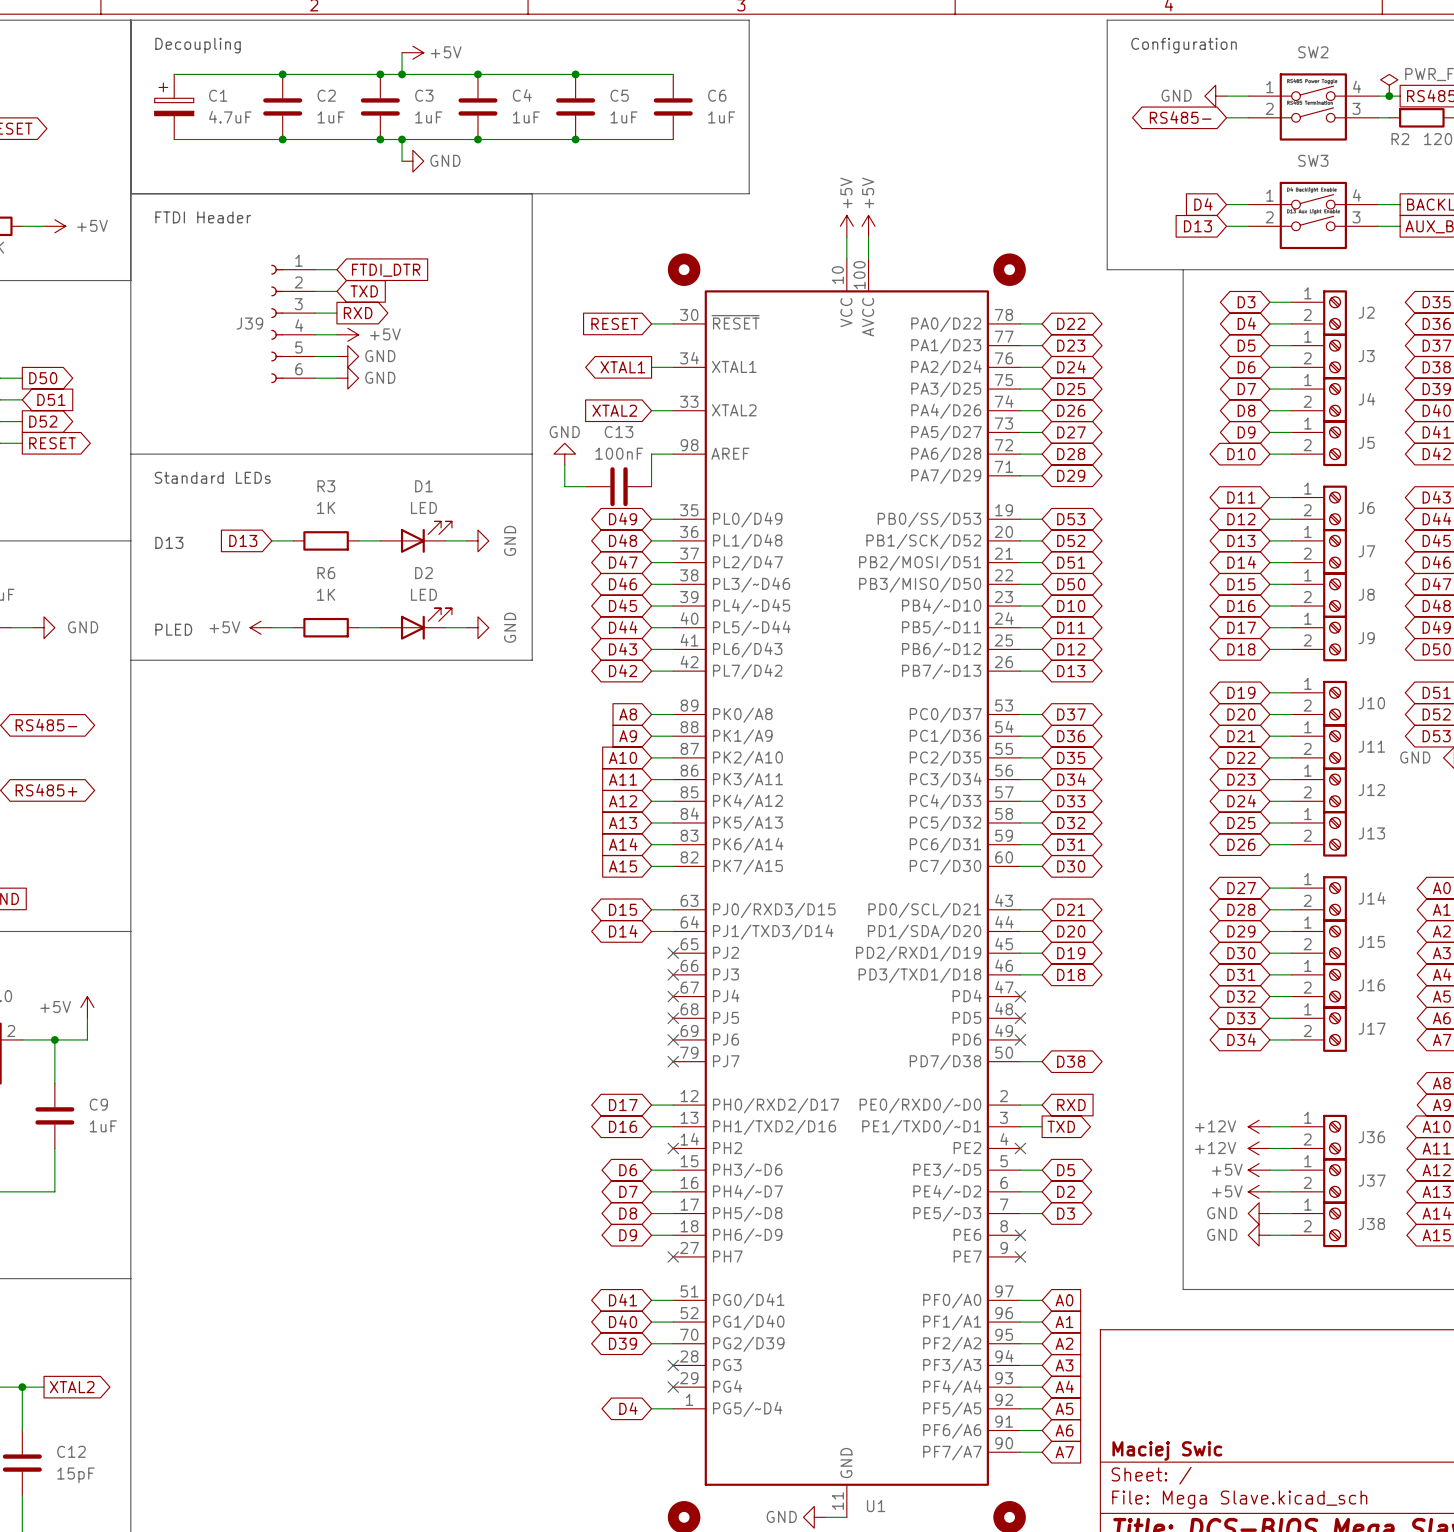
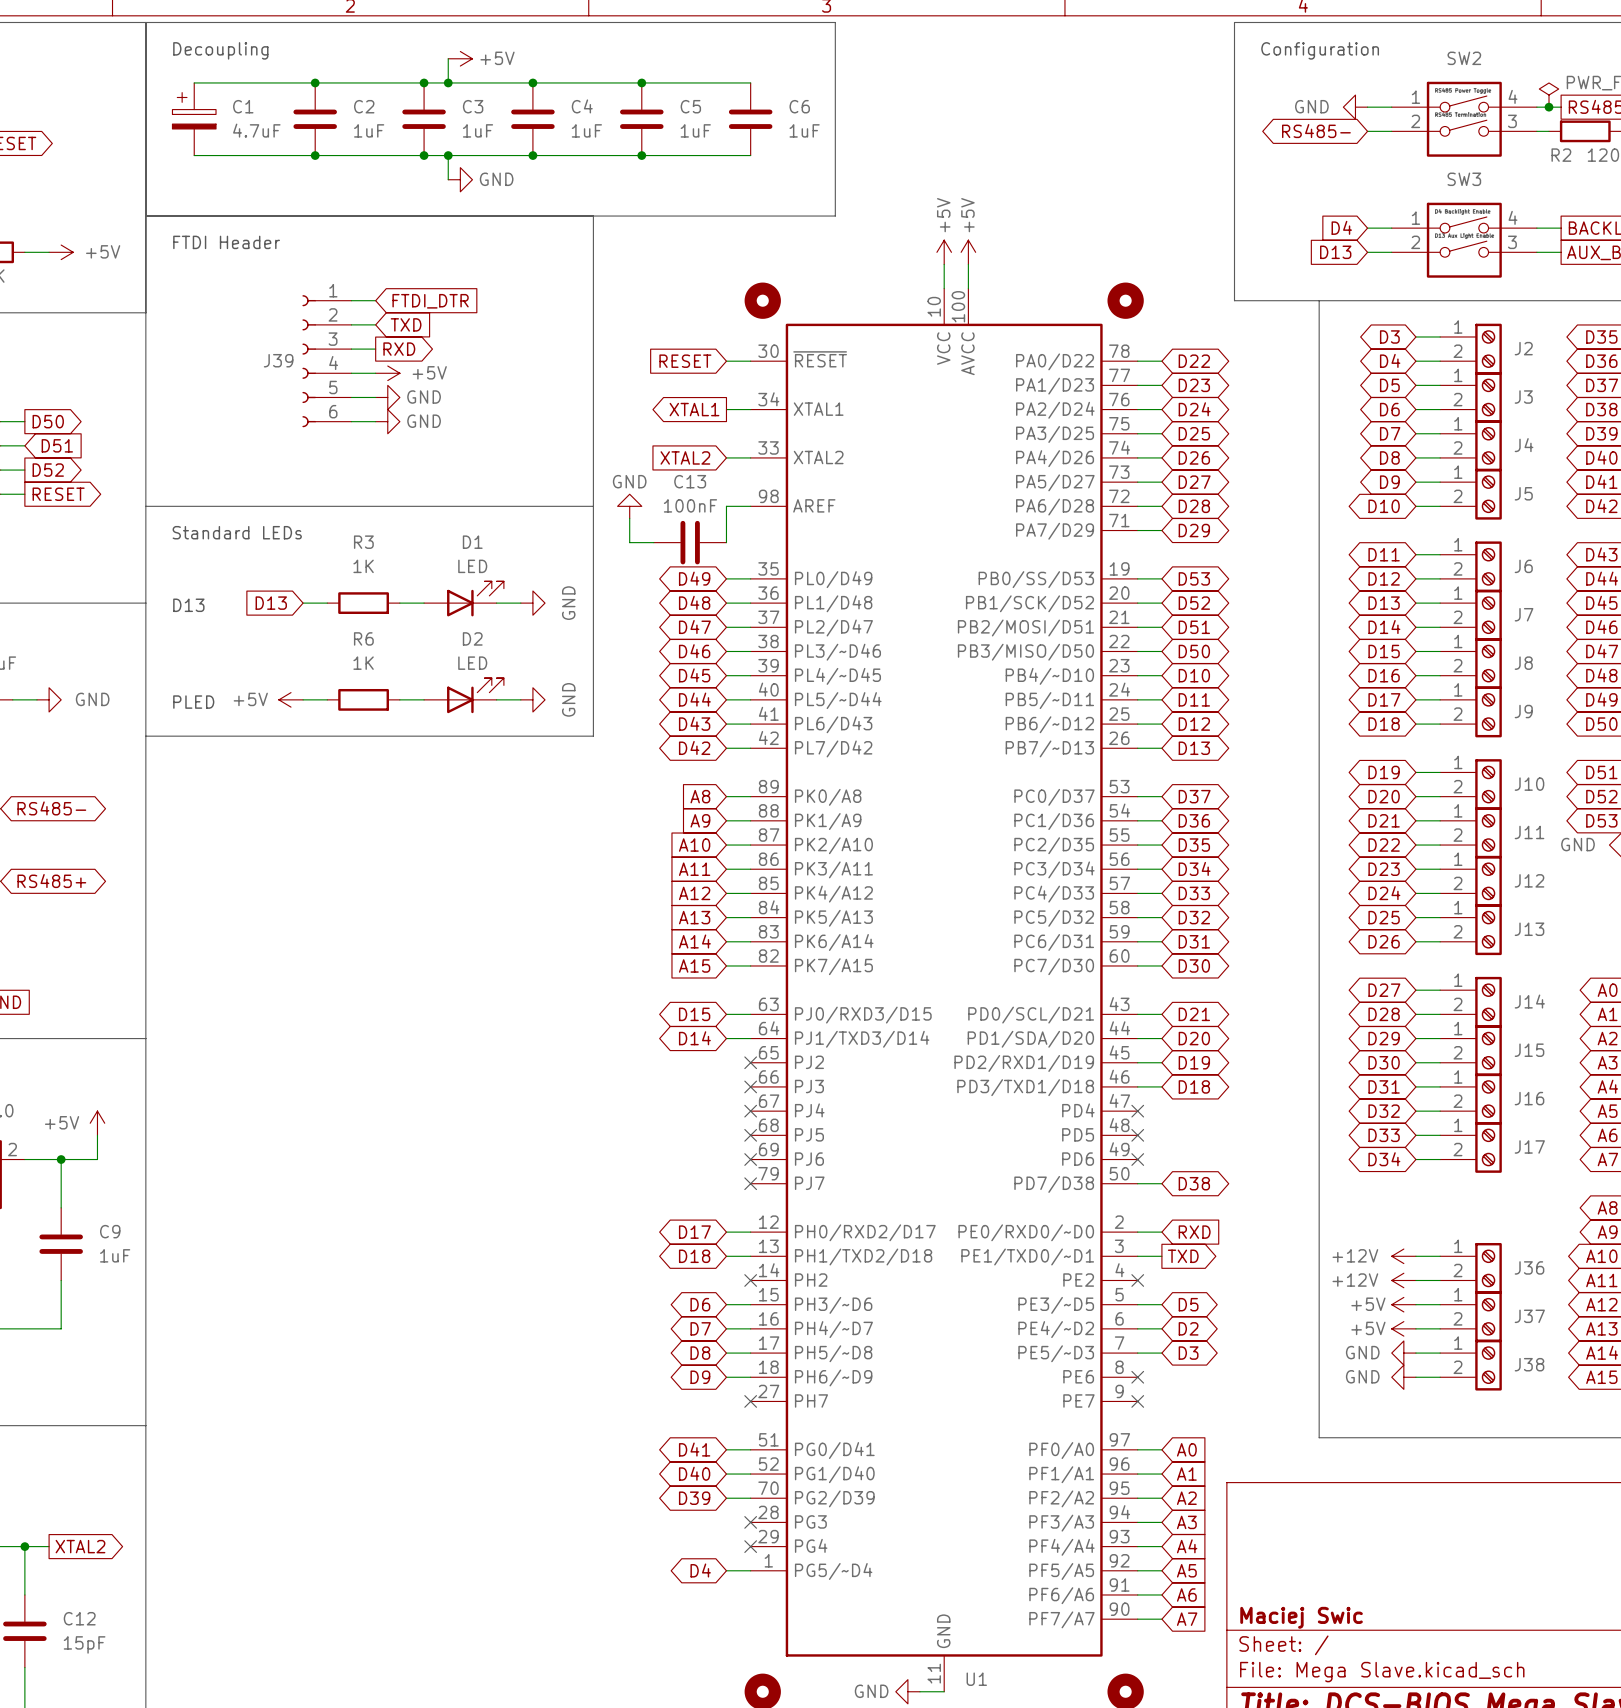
global label: D16 (623, 1126) -> D18 (694, 1256)
U1 pin name: PH1/TXD2/D16 (774, 1127) -> PH1/TXD2/D18 (863, 1256)

